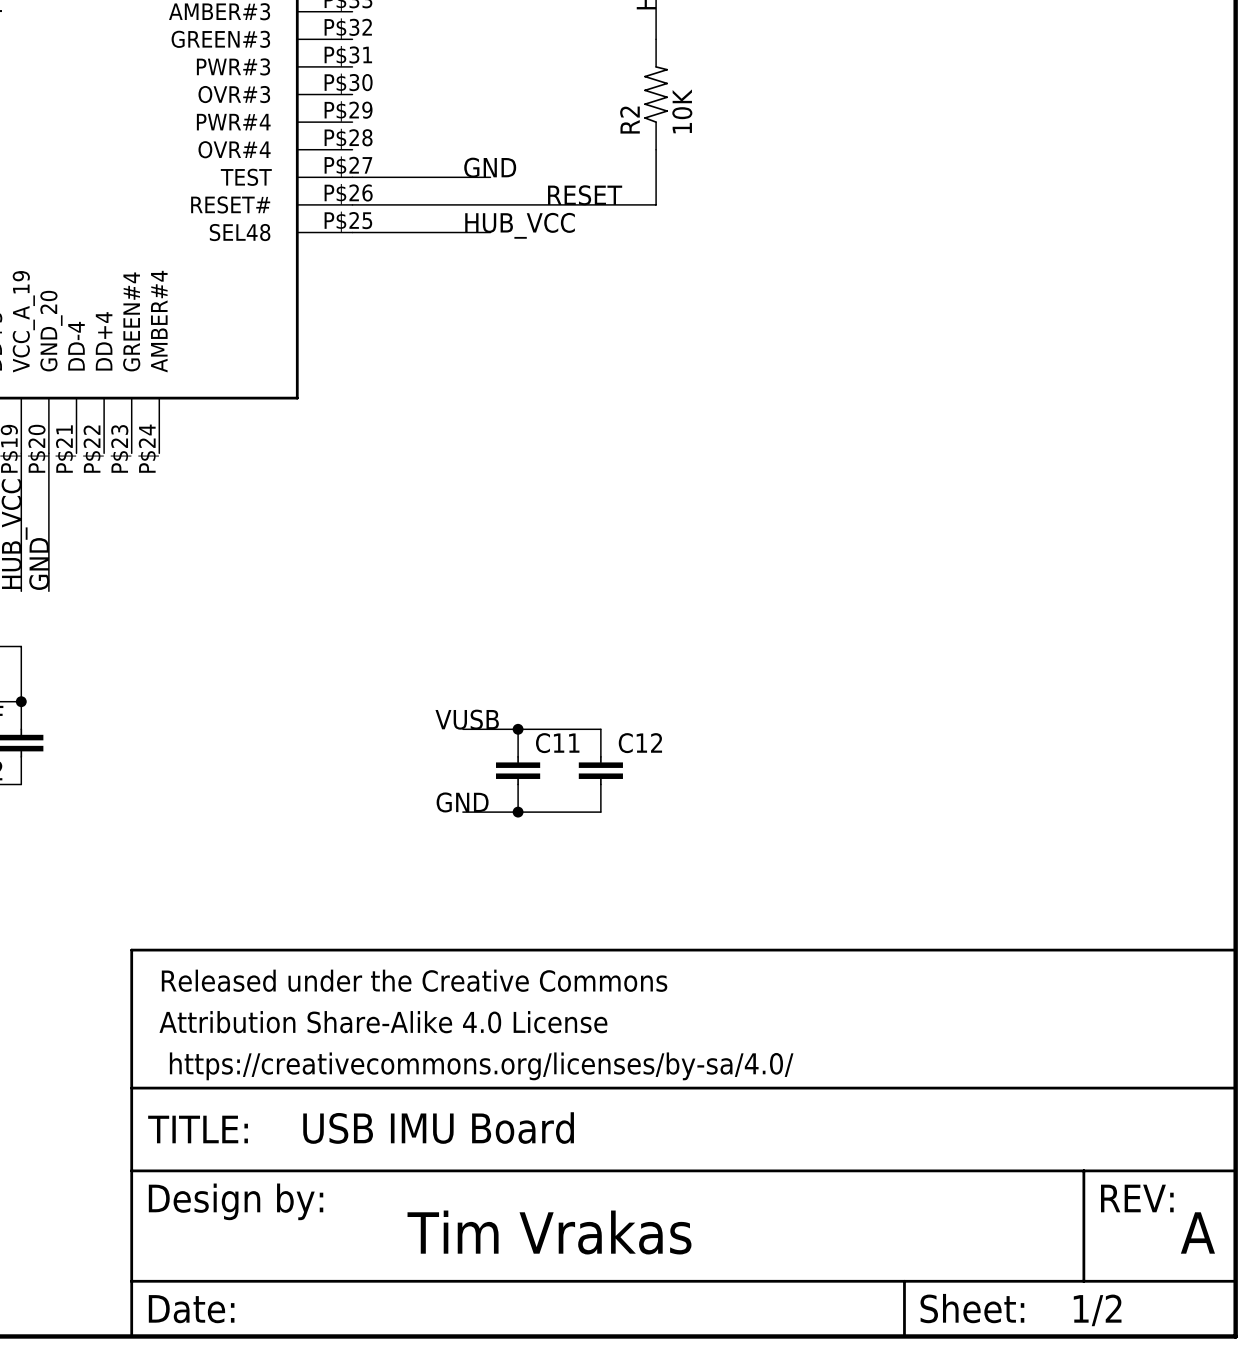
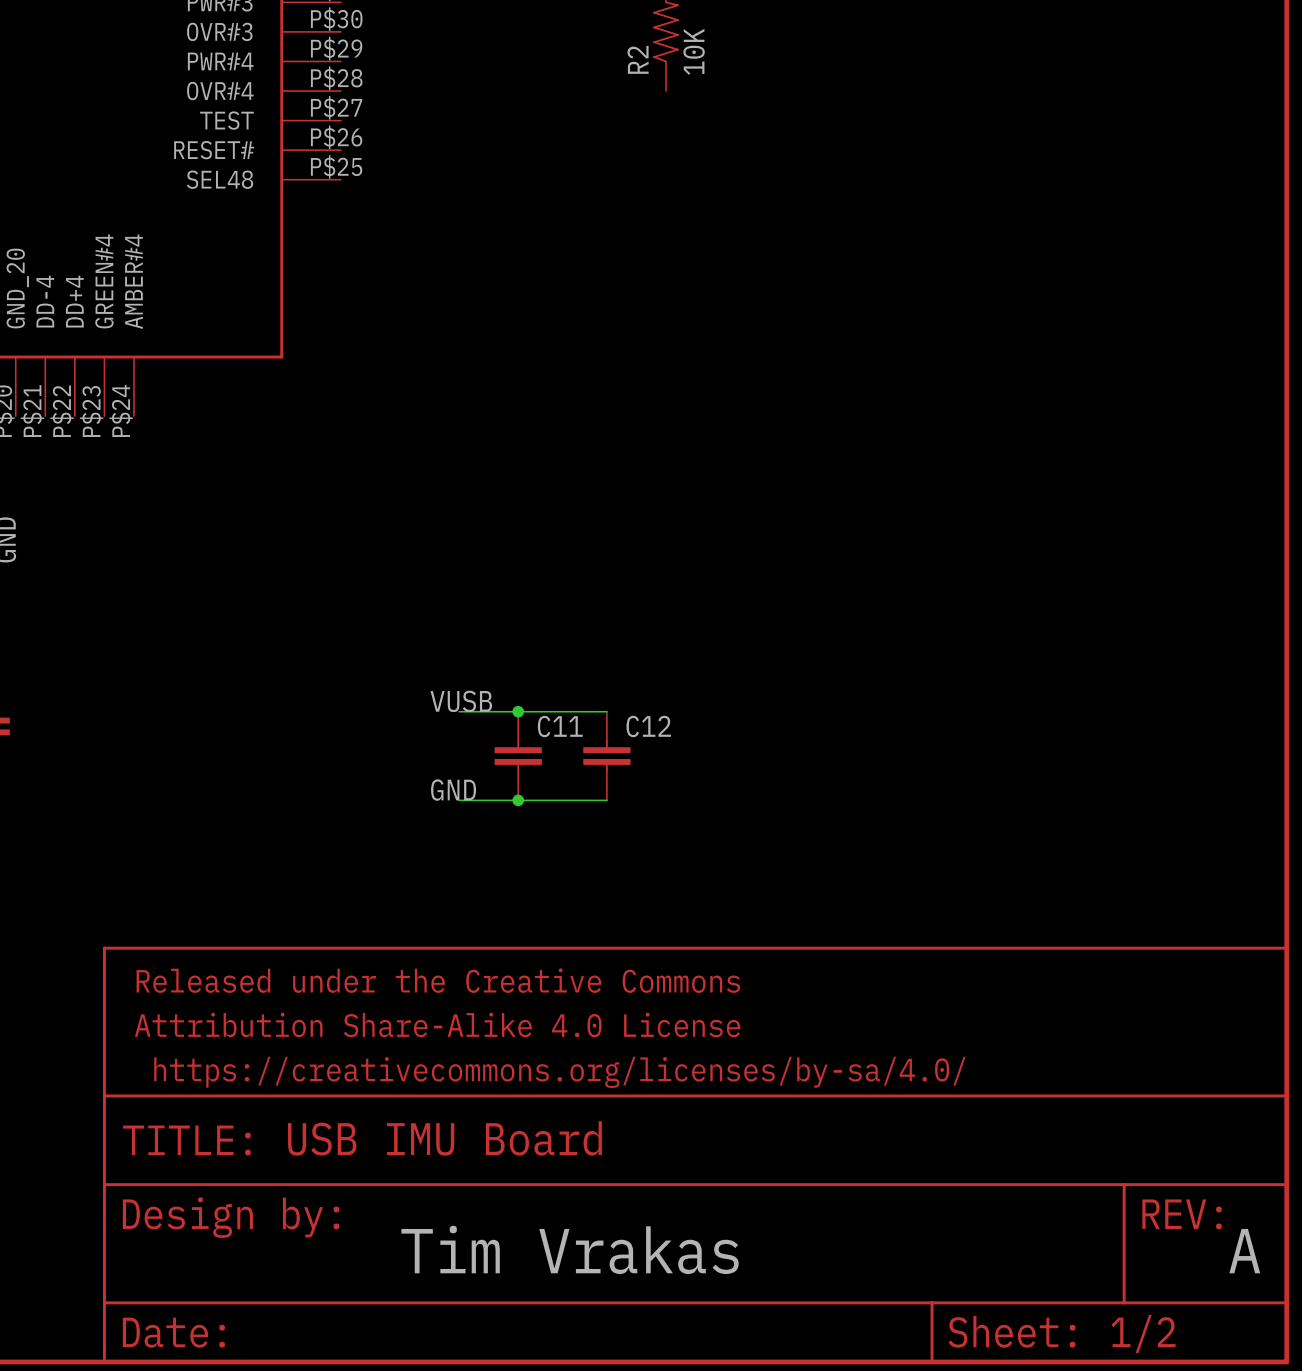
wire: (656, 149) (656, 204) (352, 204) -> none
label: GND (490, 167) -> none
wire: (352, 177) (490, 177) -> none
label: RESET (585, 195) -> none
label: HUB_VCC (520, 225) -> none
wire: (352, 232) (490, 232) -> none
wire: (48, 453) (48, 591) -> none

